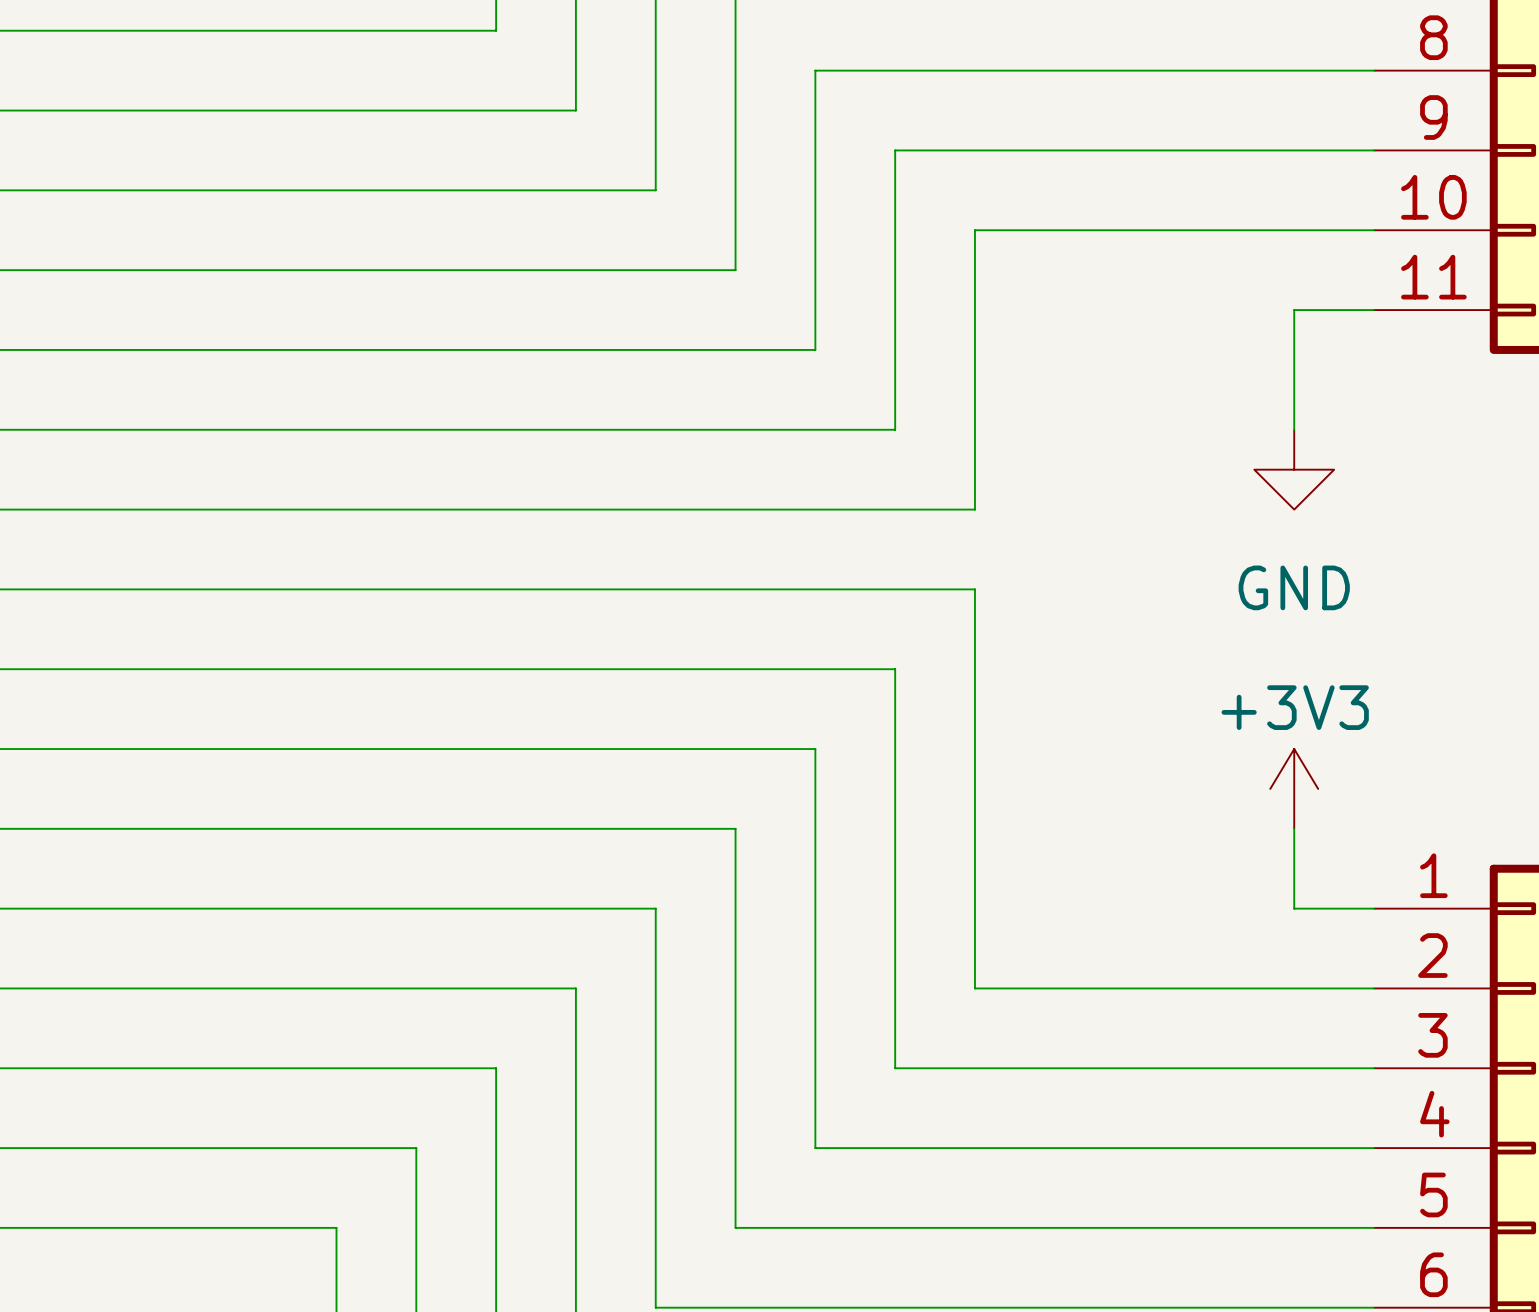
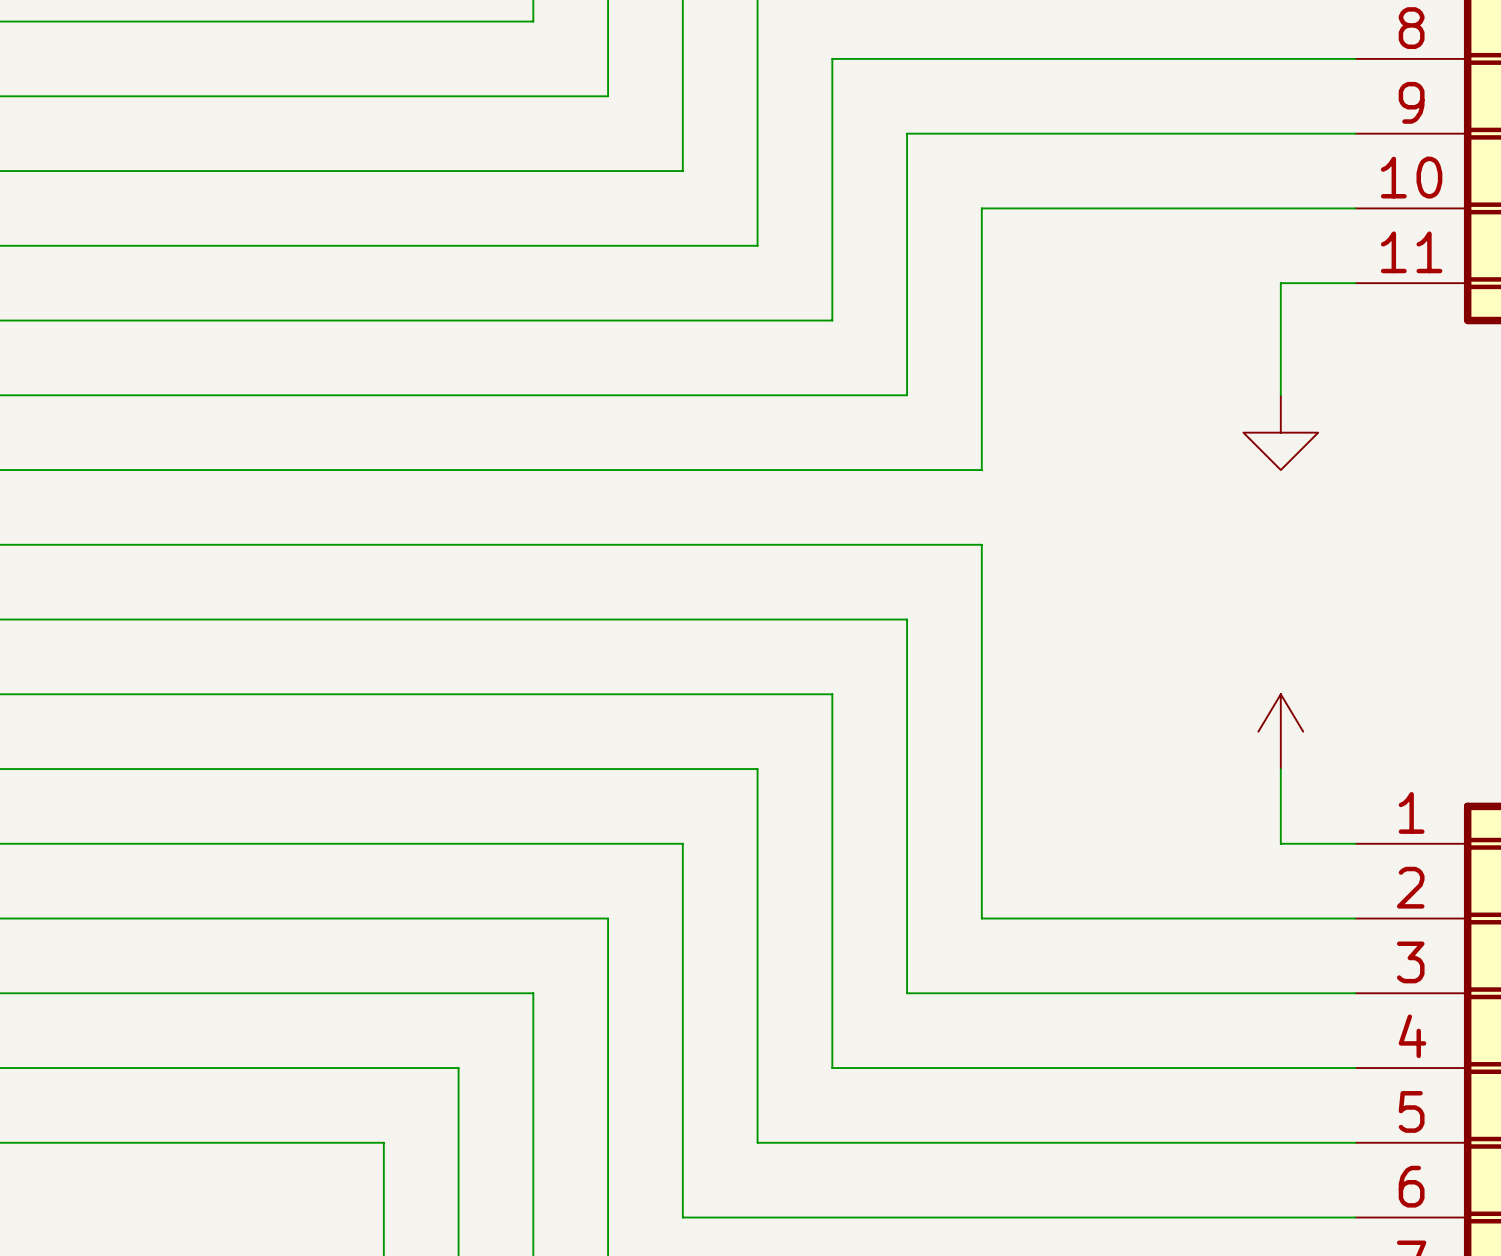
power symbol text: GND (1294, 587) -> none
power symbol text: +3V3 (1295, 707) -> none

